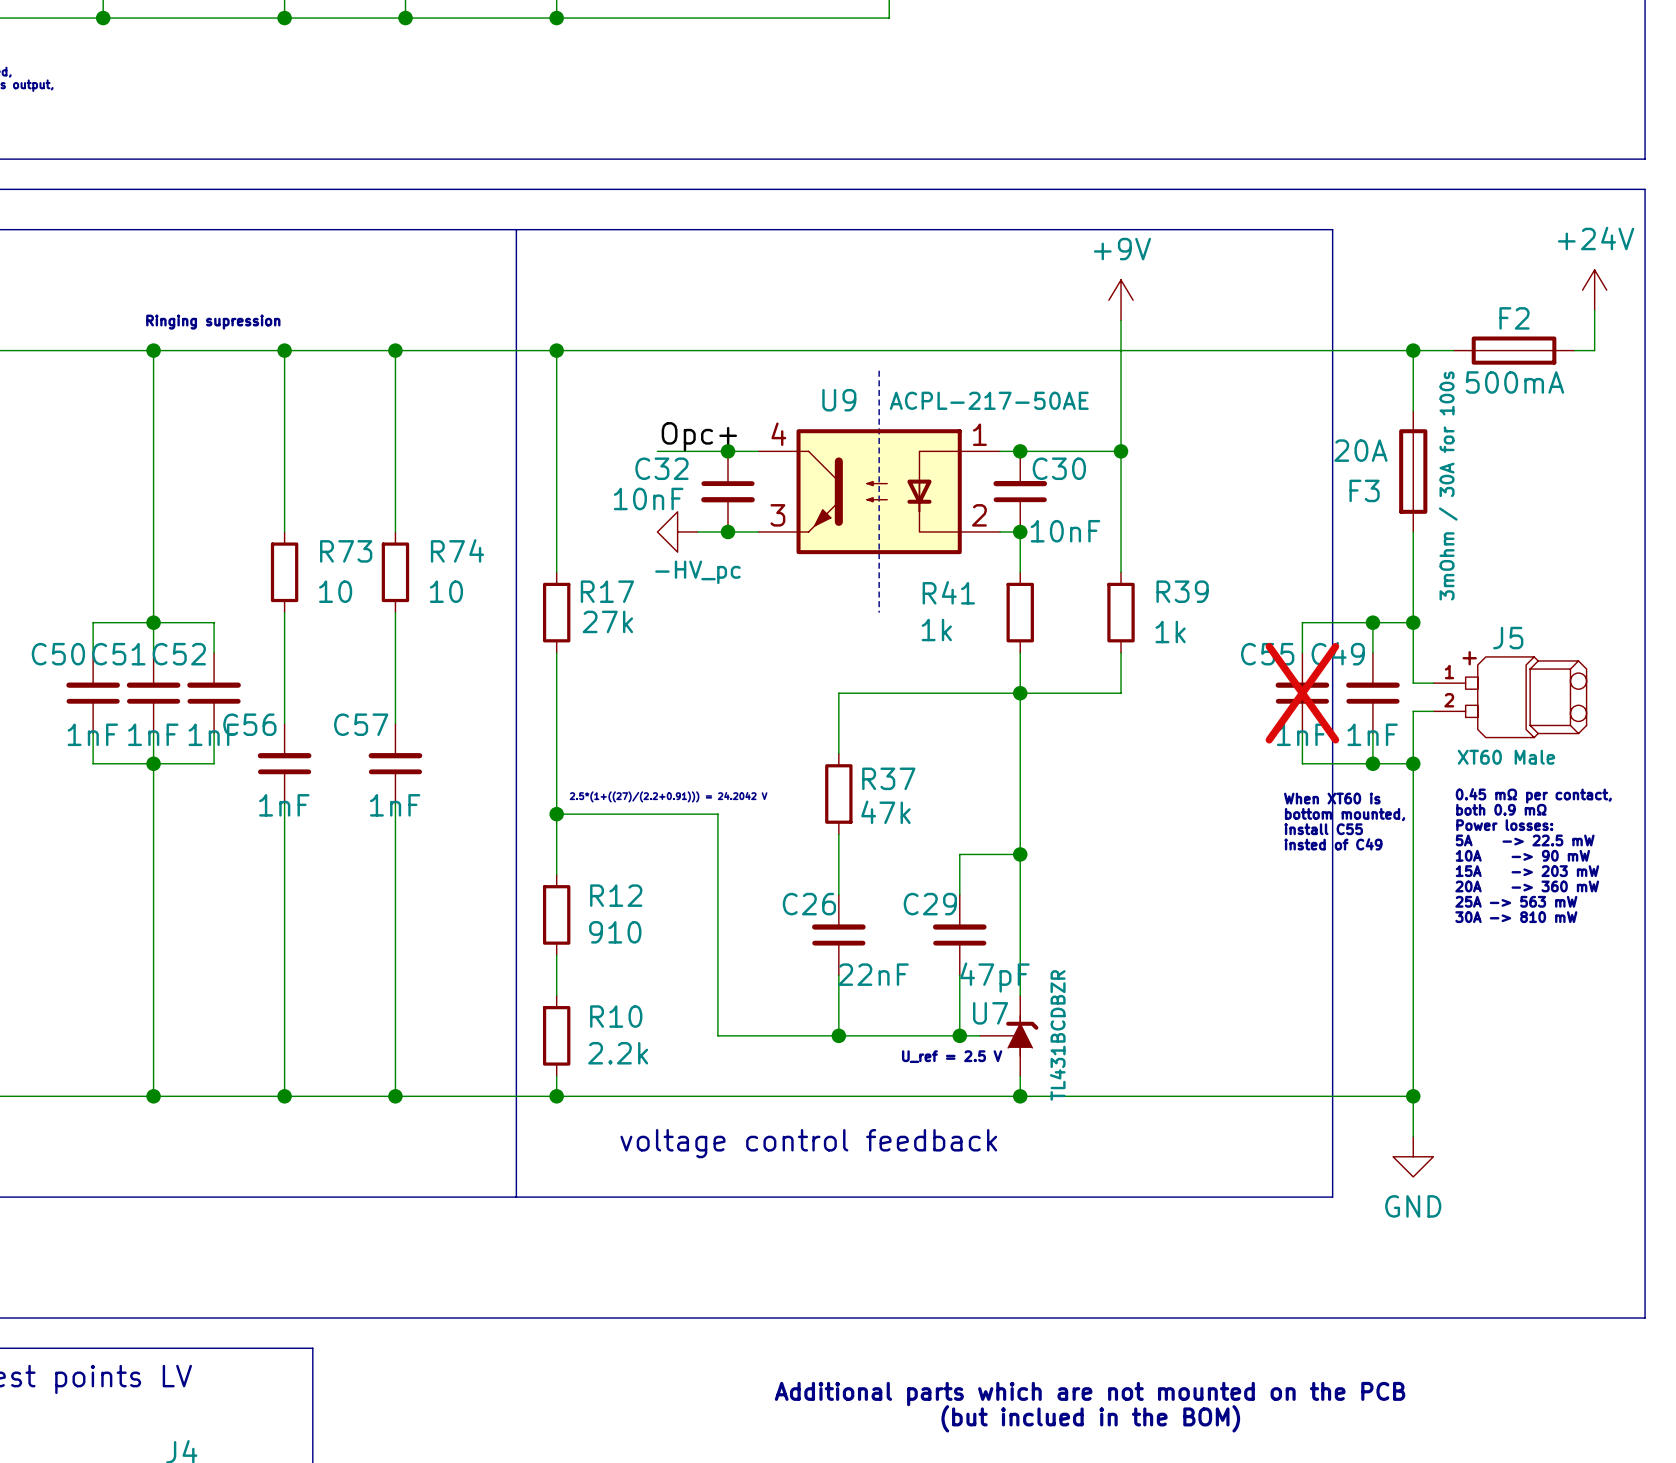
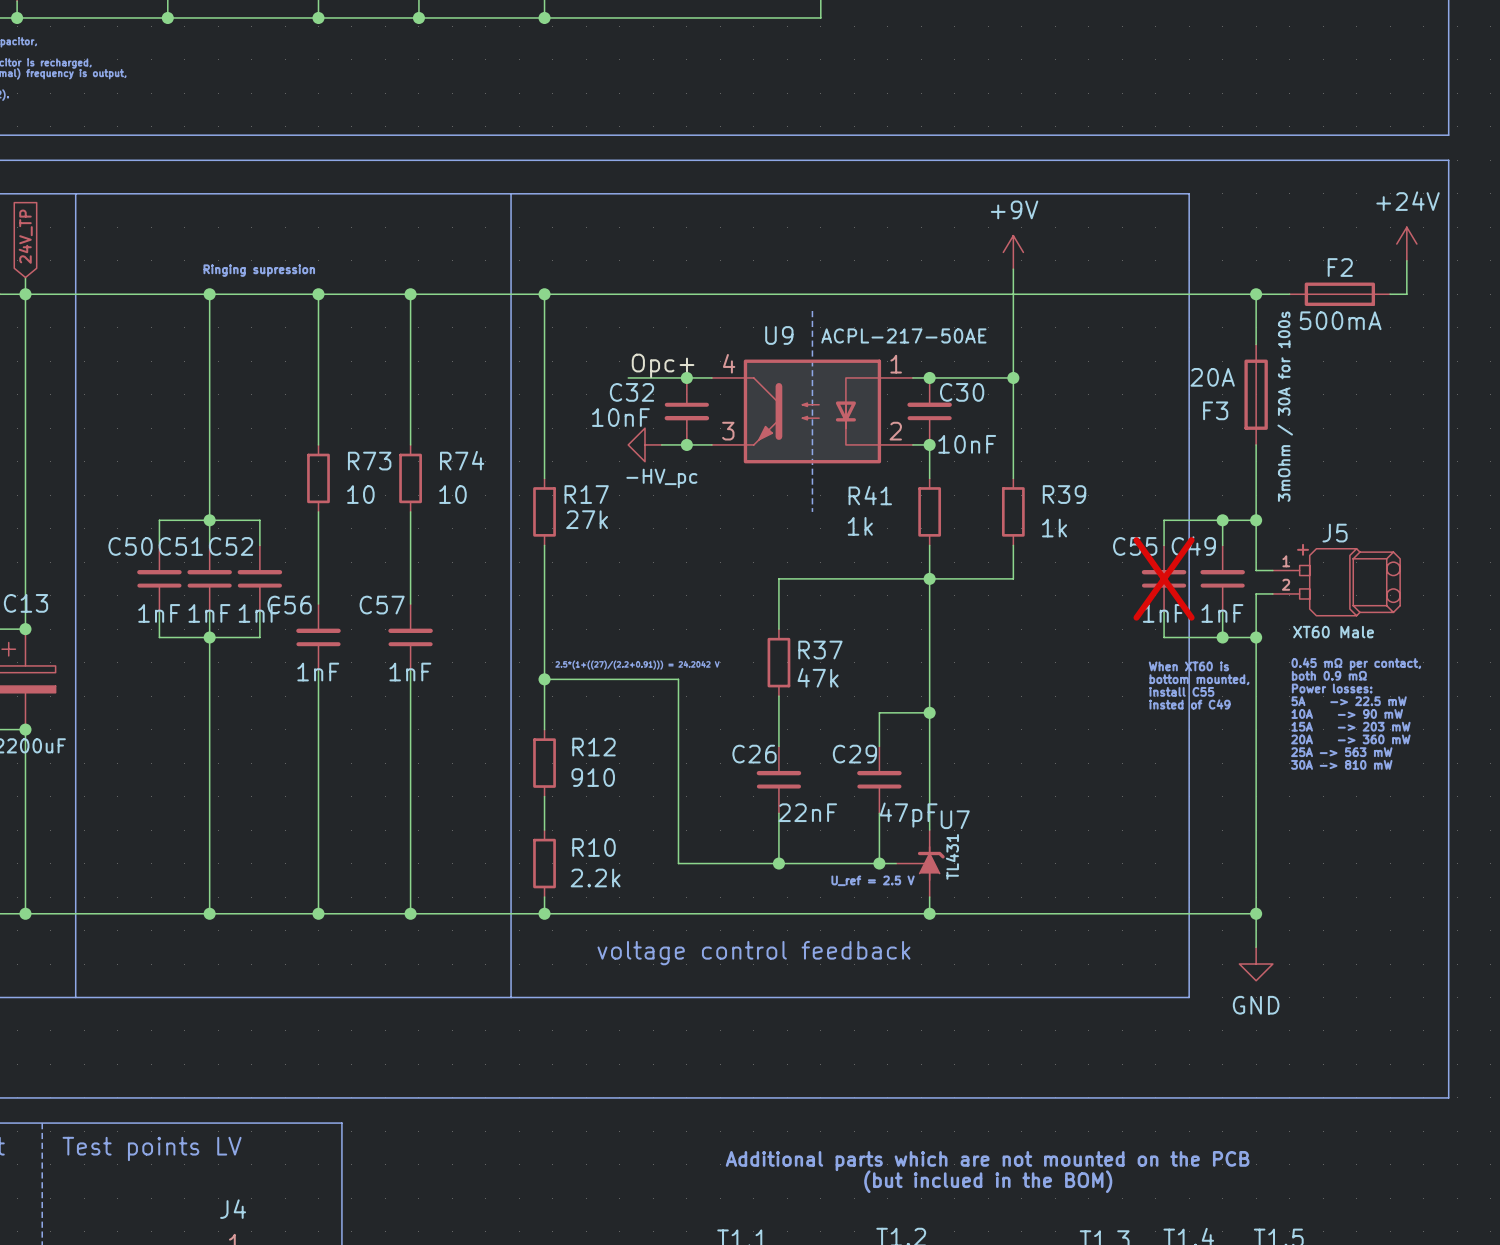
U7 name position: U7 (990, 1013) -> U7 (955, 819)
U7 value: TL431BCDBZR (1057, 1035) -> TL431 (952, 856)

